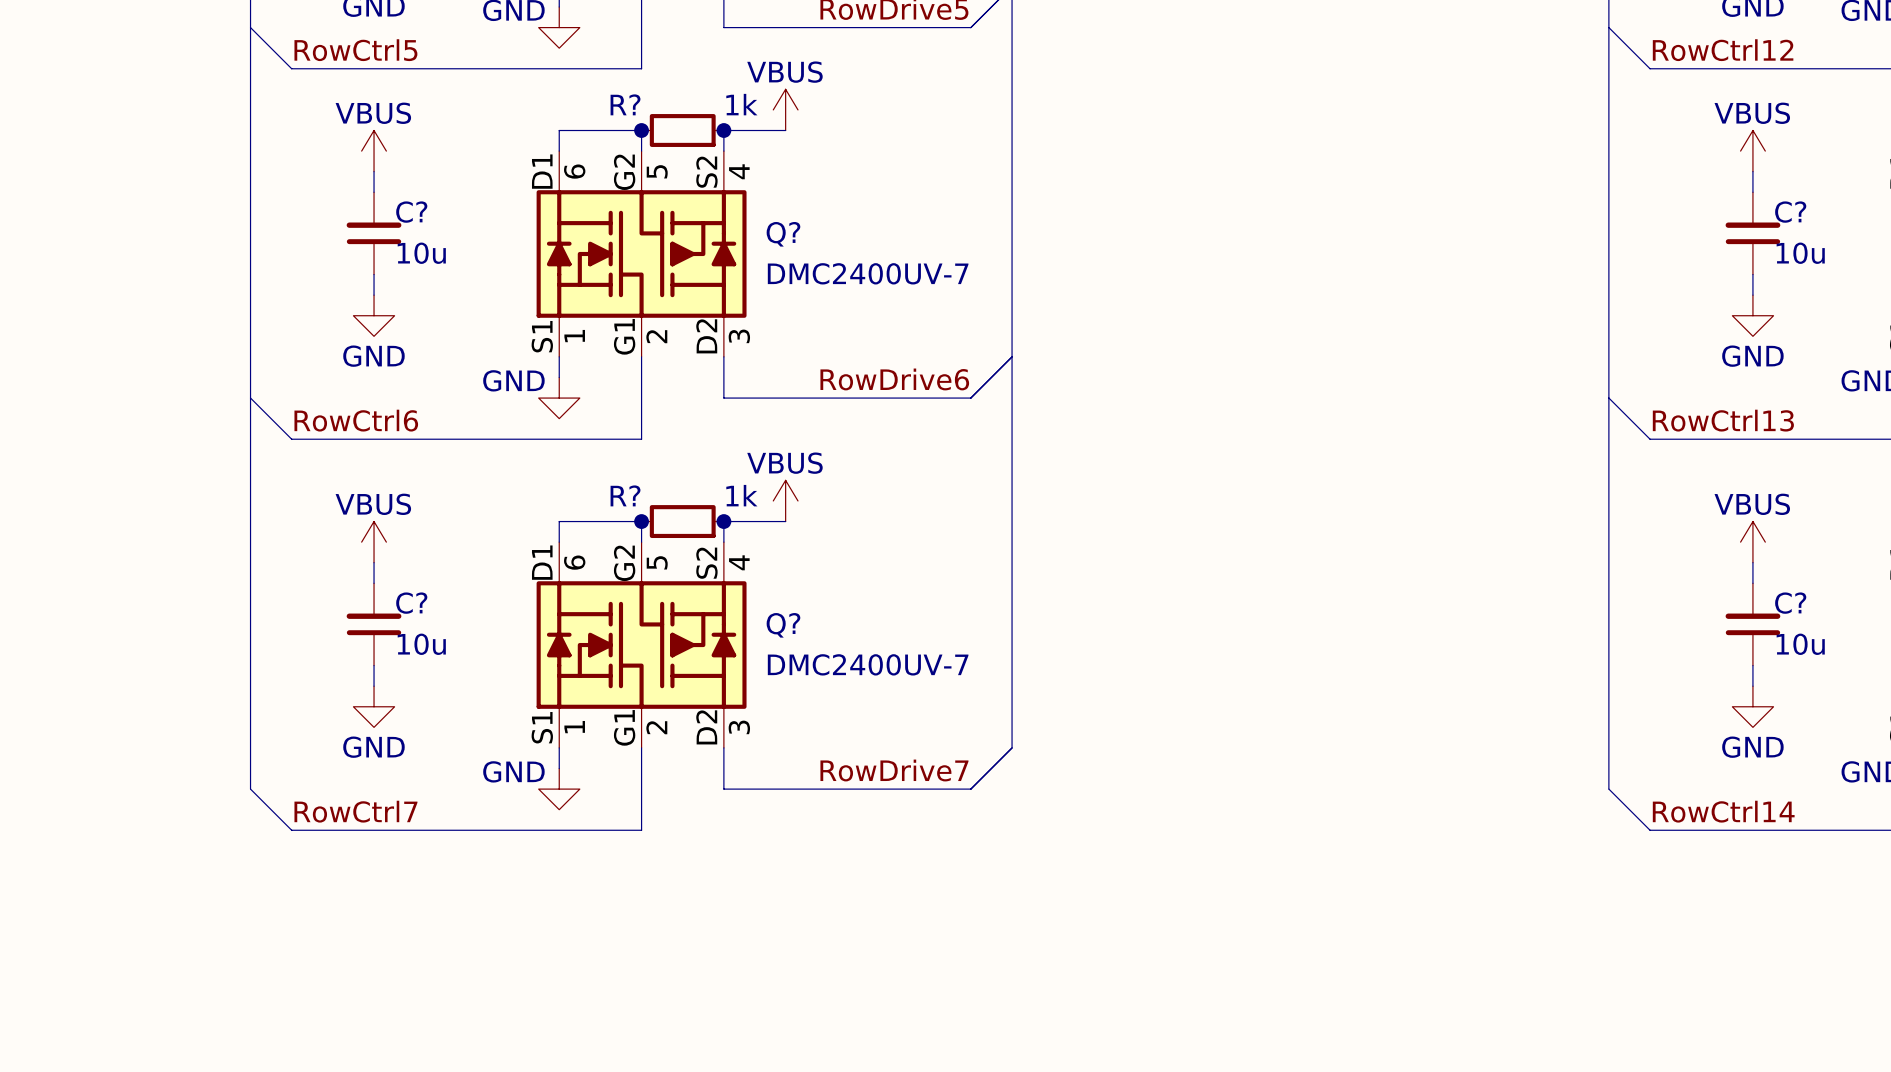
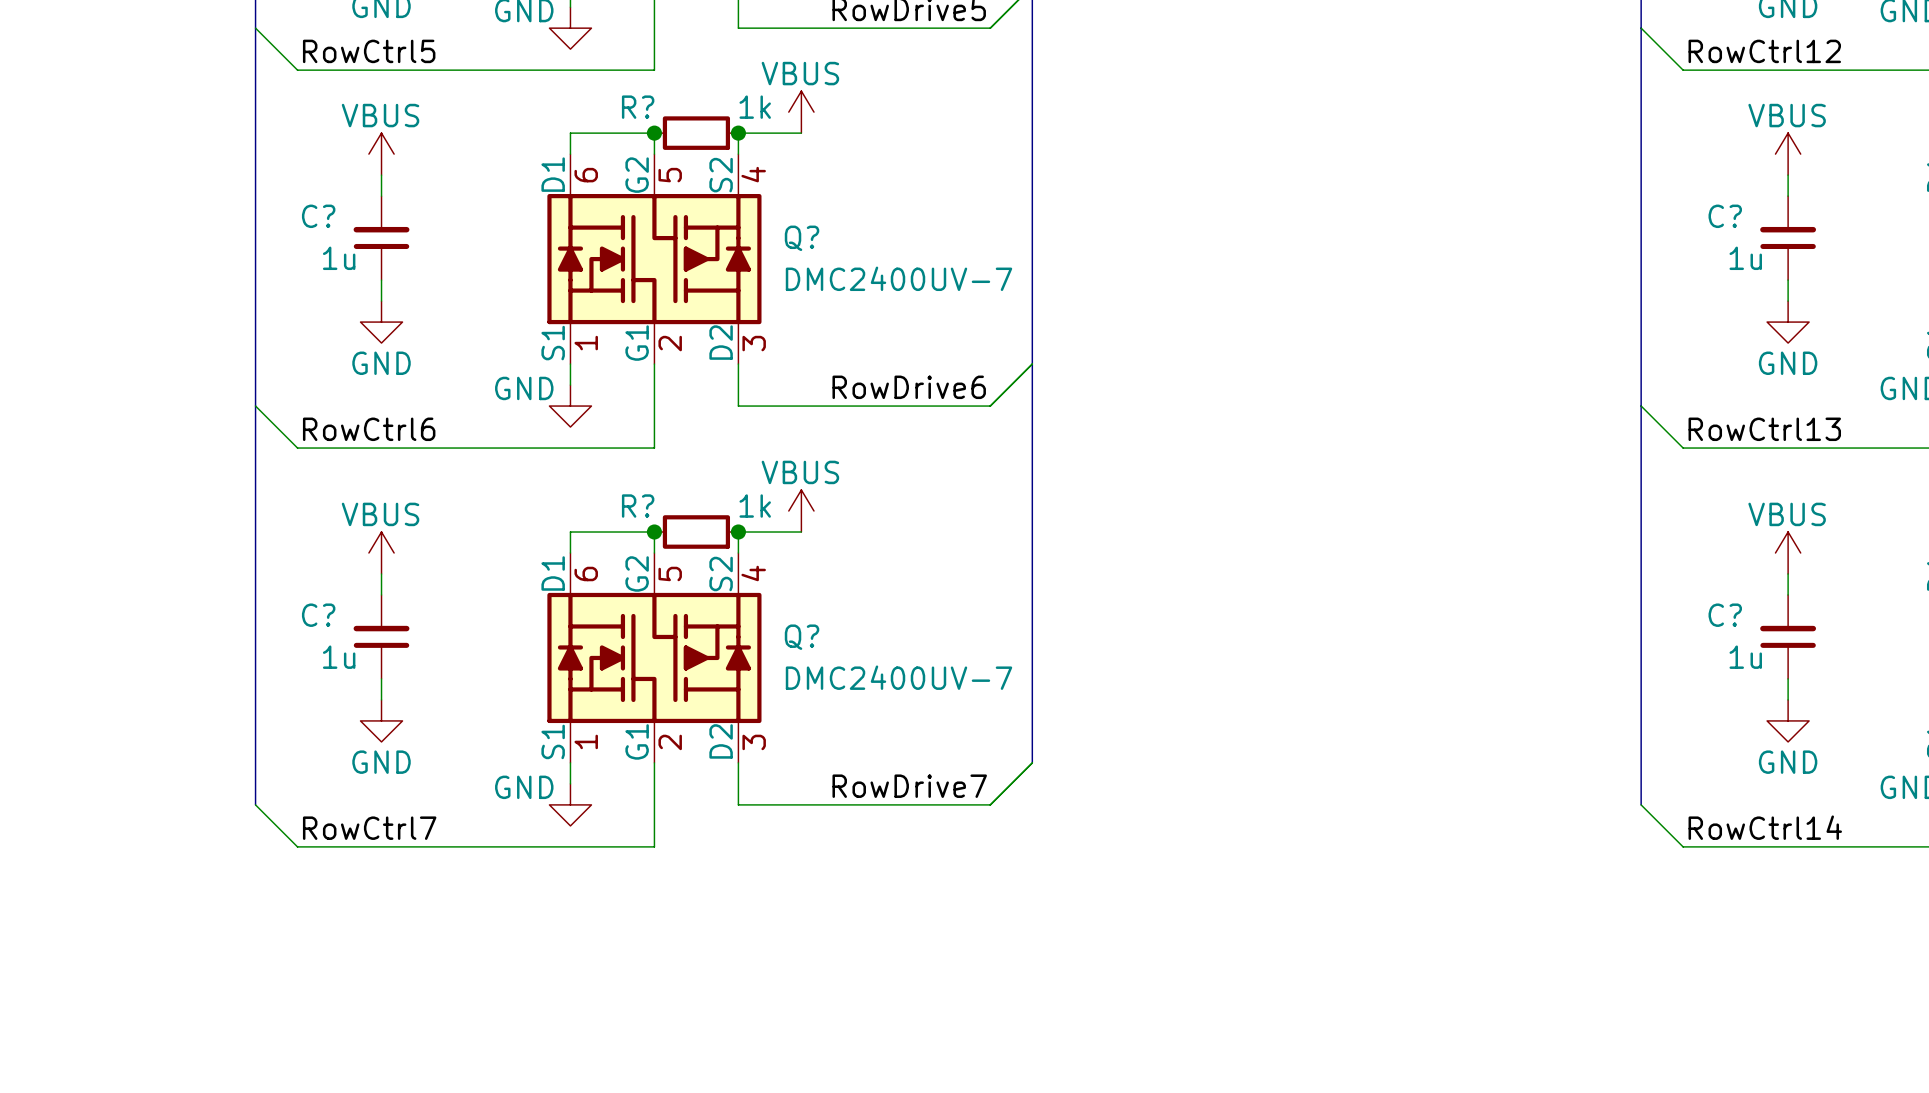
C? name position: C? (411, 212) -> C? (318, 216)
C? name position: C? (1790, 212) -> C? (1725, 216)
C? text: 10u (421, 253) -> 1u (339, 258)
C? text: 10u (1800, 253) -> 1u (1745, 258)
C? name position: C? (411, 603) -> C? (318, 615)
C? name position: C? (1790, 603) -> C? (1725, 615)
C? text: 10u (421, 644) -> 1u (339, 657)
C? text: 10u (1800, 644) -> 1u (1745, 657)

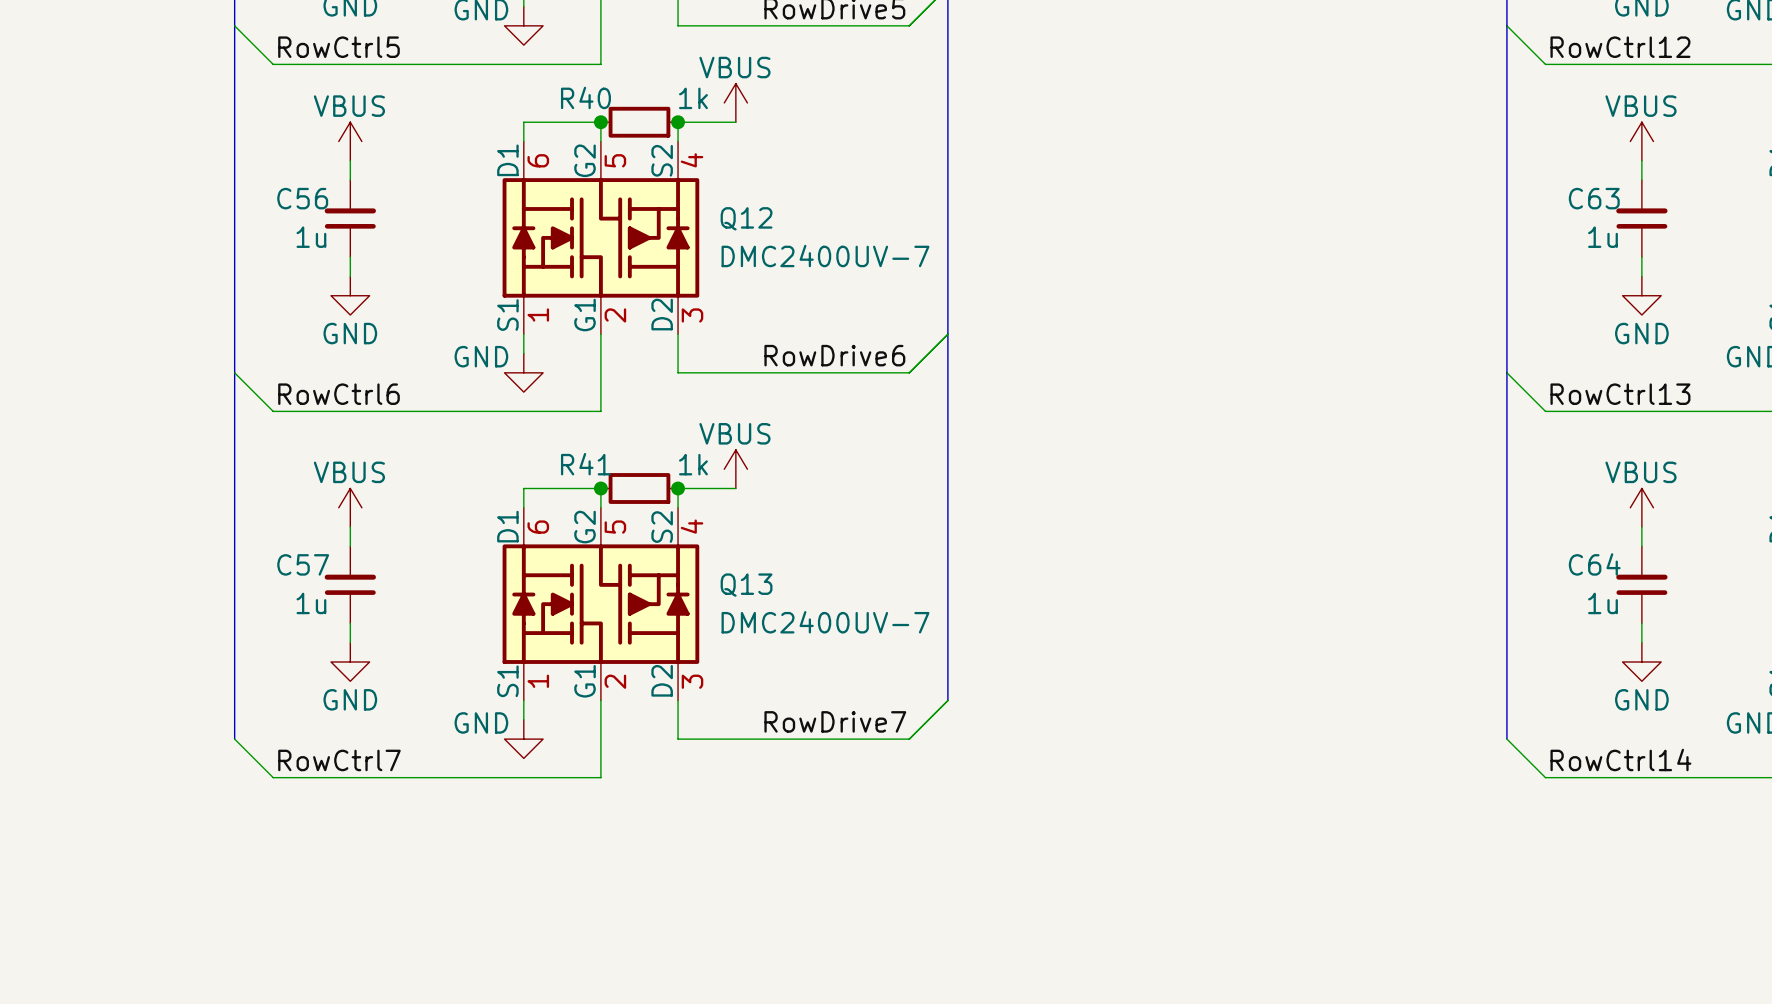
R? name: R? (638, 107) -> R40 (585, 97)
C? name: C? (318, 216) -> C56 (302, 198)
C? name: C? (1725, 216) -> C63 (1594, 198)
Q? name: Q? (802, 238) -> Q12 (746, 218)
R? name: R? (638, 506) -> R41 (585, 464)
C? name: C? (318, 615) -> C57 (303, 564)
C? name: C? (1725, 615) -> C64 (1594, 564)
Q? name: Q? (802, 637) -> Q13 (746, 585)

